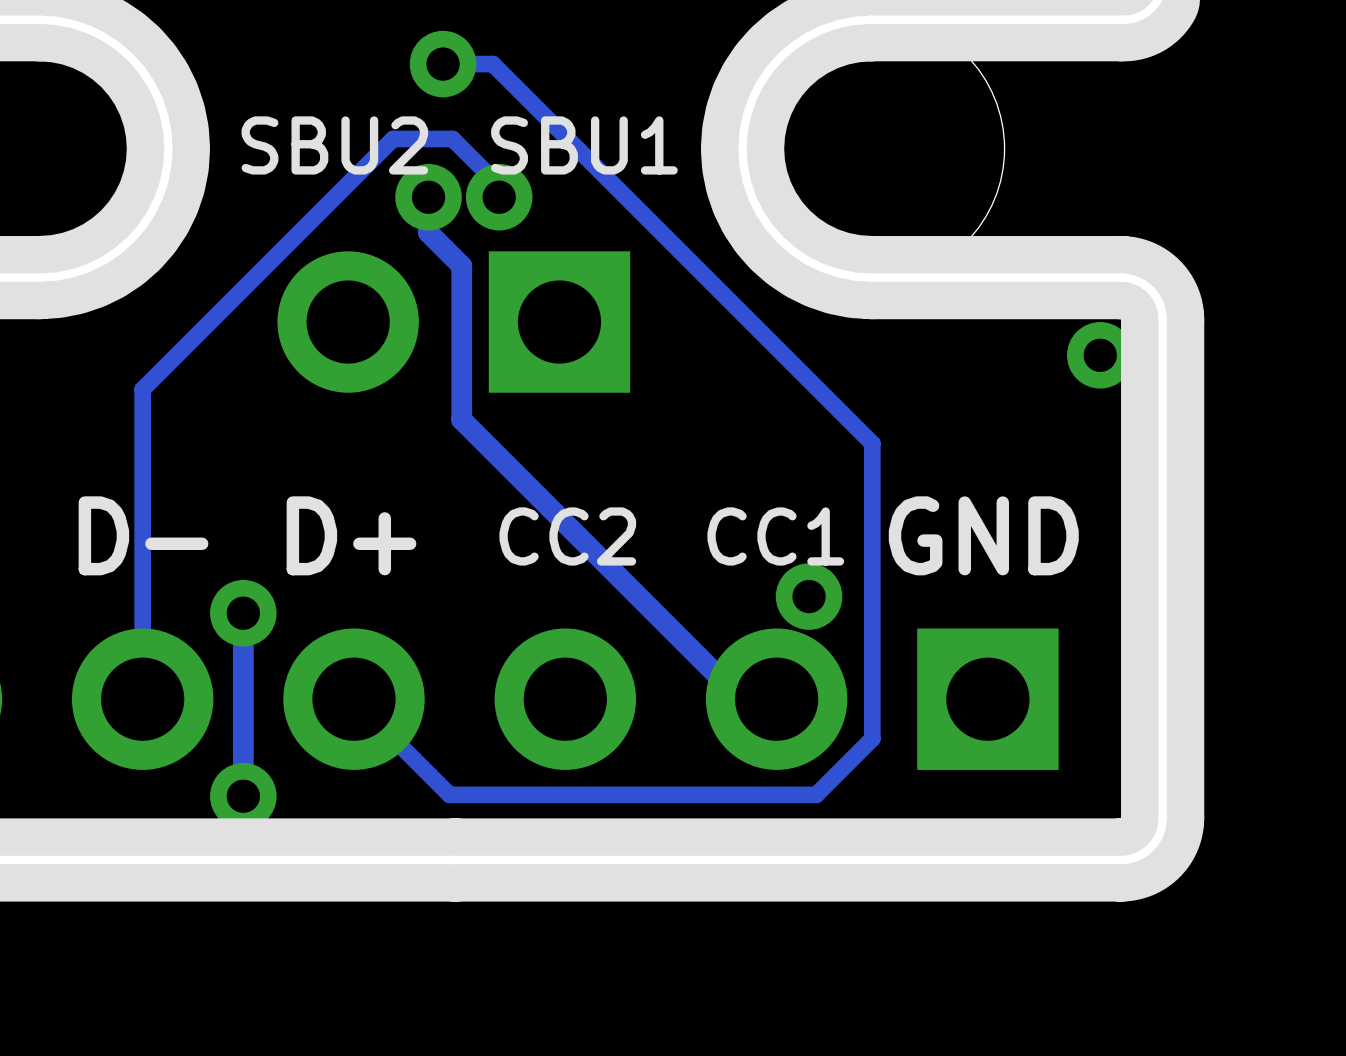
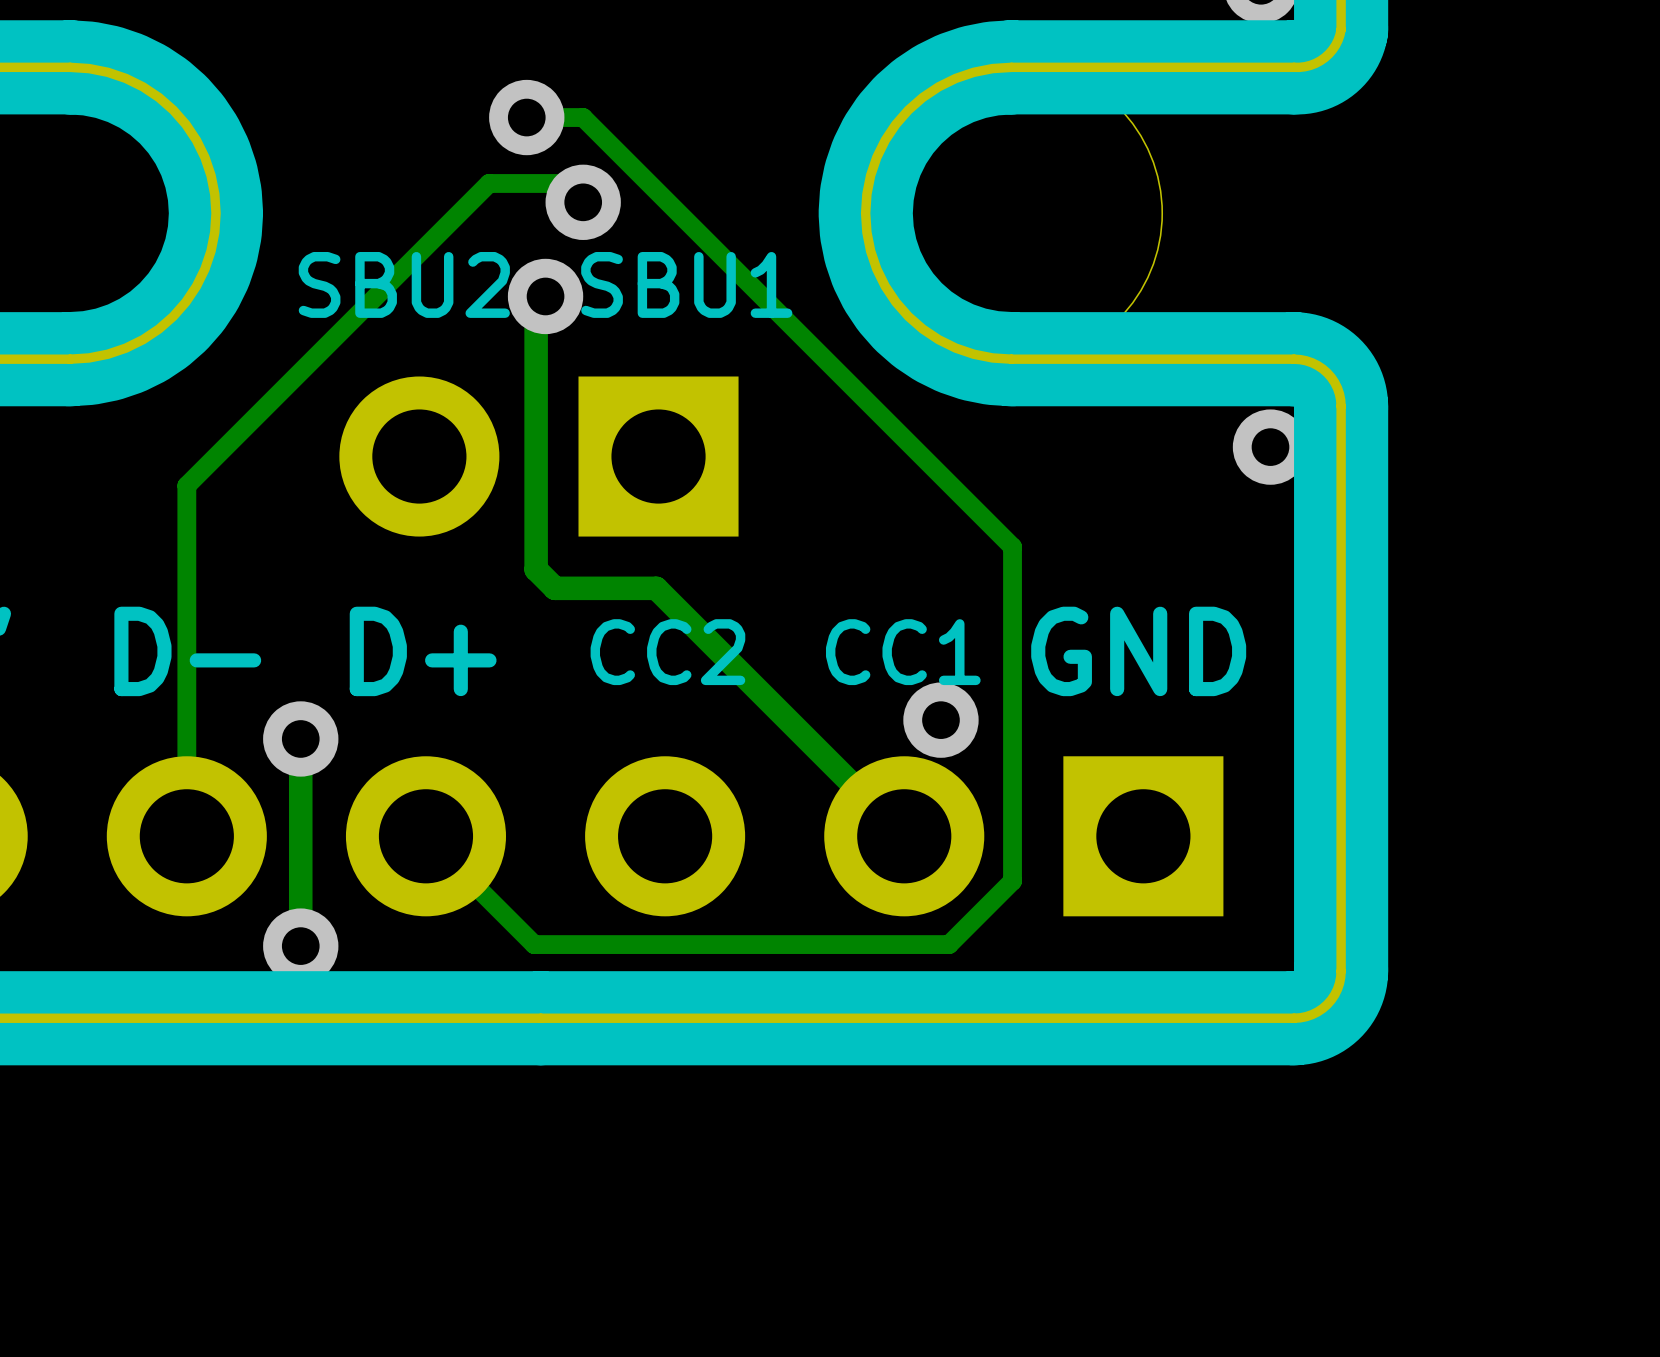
track: (393, 139) (452, 139) (499, 185) (499, 197) -> (470, 202) (489, 183) (564, 183) (583, 202)
via: none -> (583, 202)
text position: SBU2 (334, 145) -> SBU2 (404, 284)
text position: SBU1 (584, 145) -> SBU1 (686, 284)
track: (428, 197) (428, 232) (461, 265) (461, 419) (741, 699) (776, 699) -> (545, 296) (536, 305) (536, 569) (554, 588) (656, 588) (904, 836)
via: (428, 197) -> none
via: (499, 197) -> none
via: none -> (545, 296)
part position: (453, 322) -> (538, 456)

